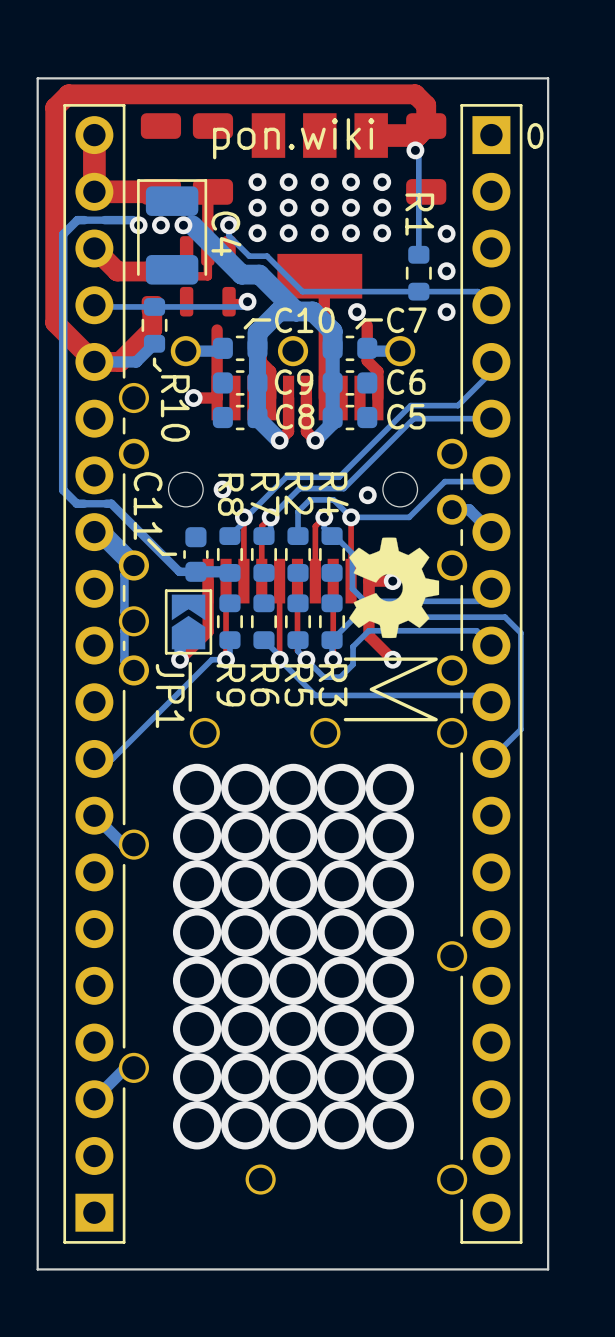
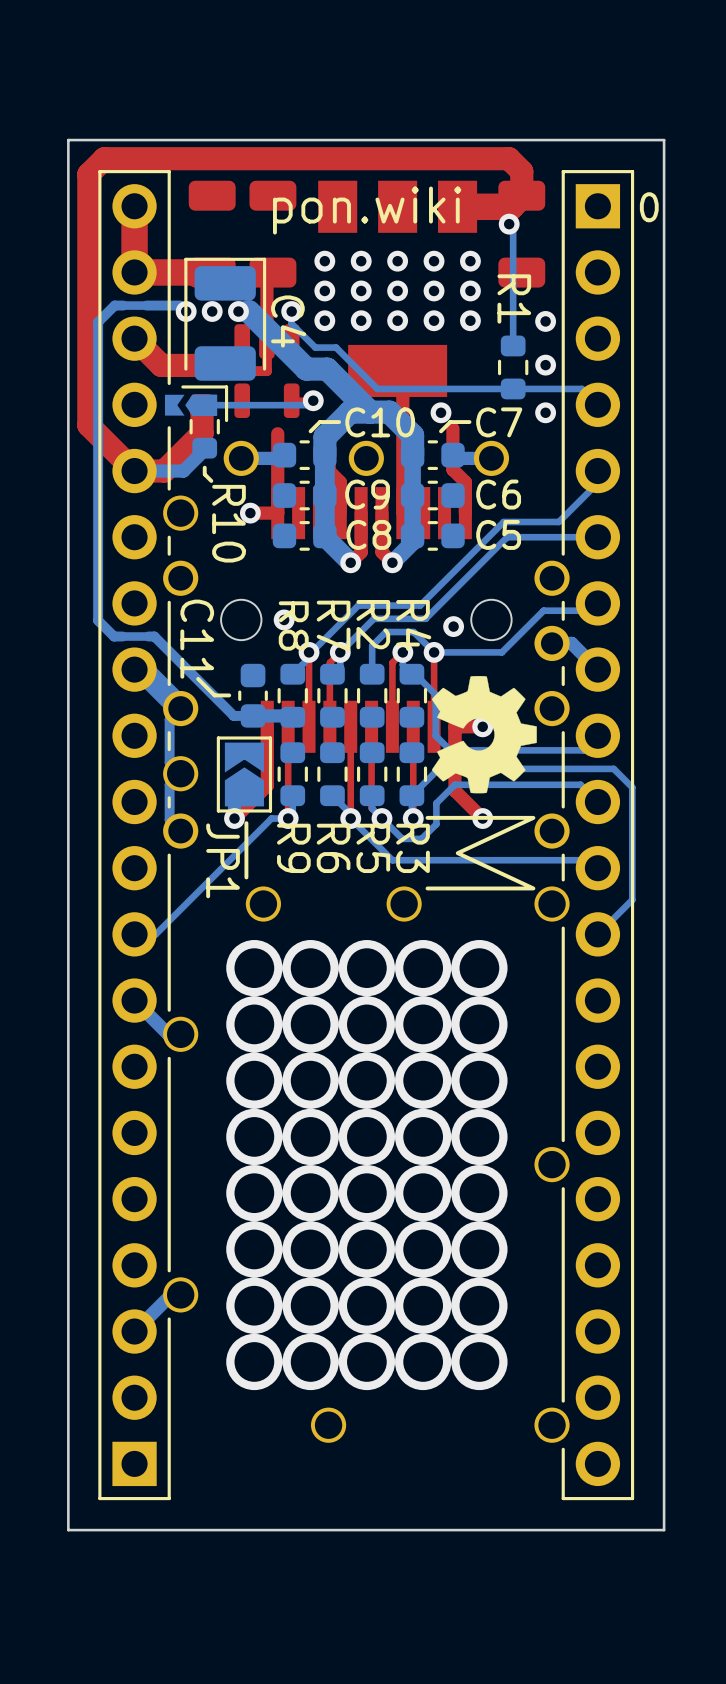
part footprint: [63, 104, 126, 1244] -> [98, 170, 171, 1501]
line: none -> (182, 386) (226, 386) (226, 420)
R10 footprint: [141, 298, 168, 353] -> [164, 394, 220, 459]
bottom track: (243, 305) (96, 306) -> (308, 405) (204, 405)

